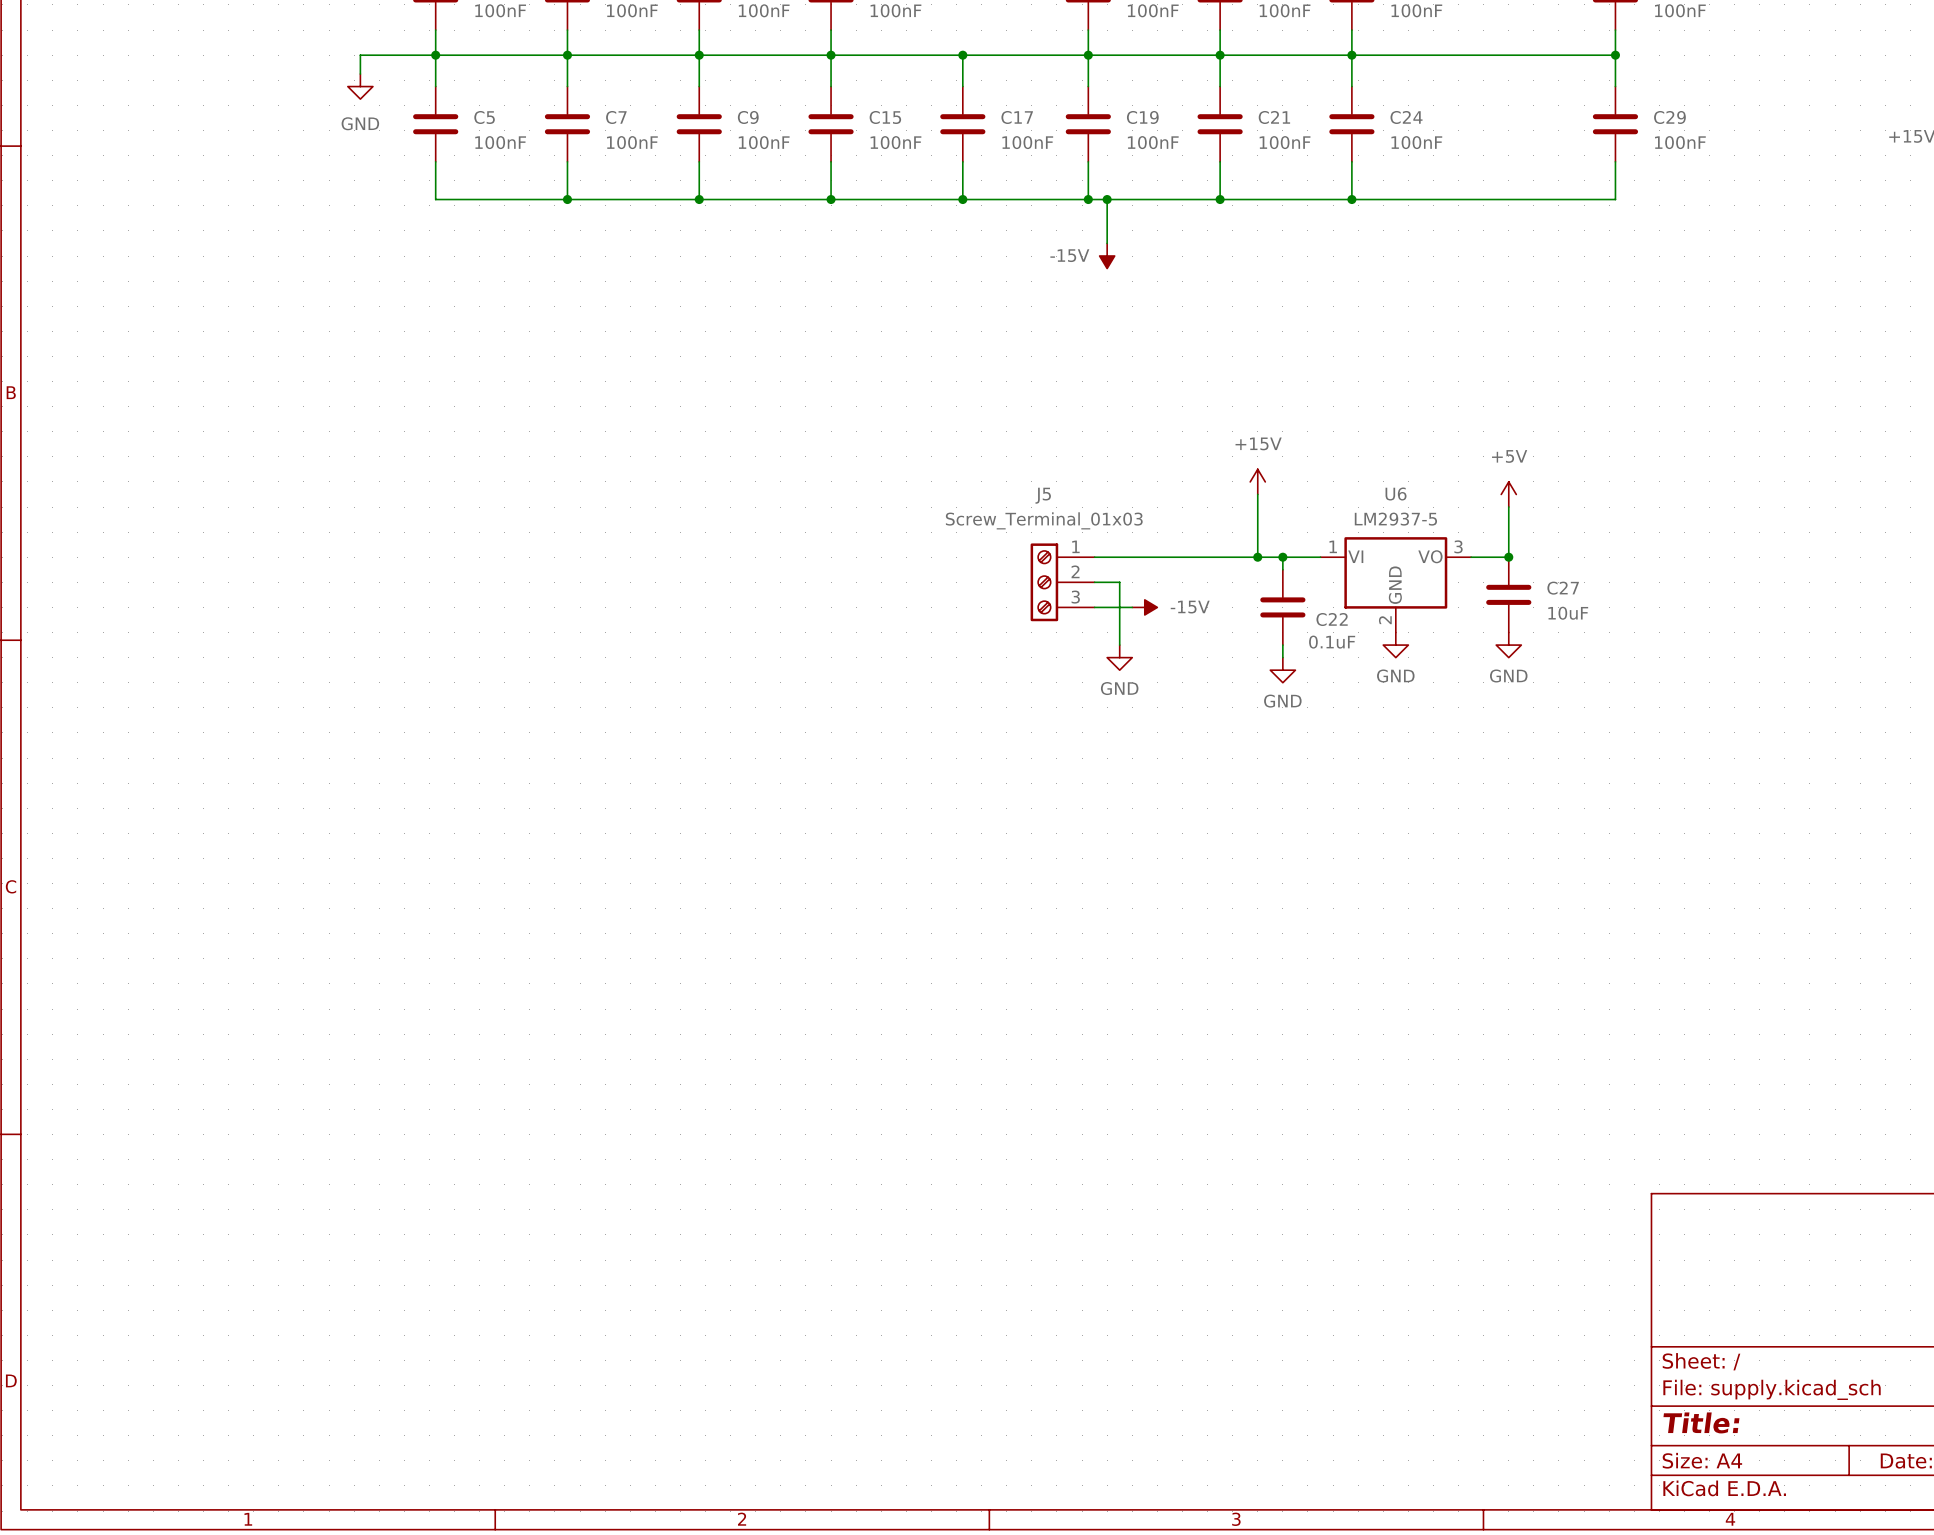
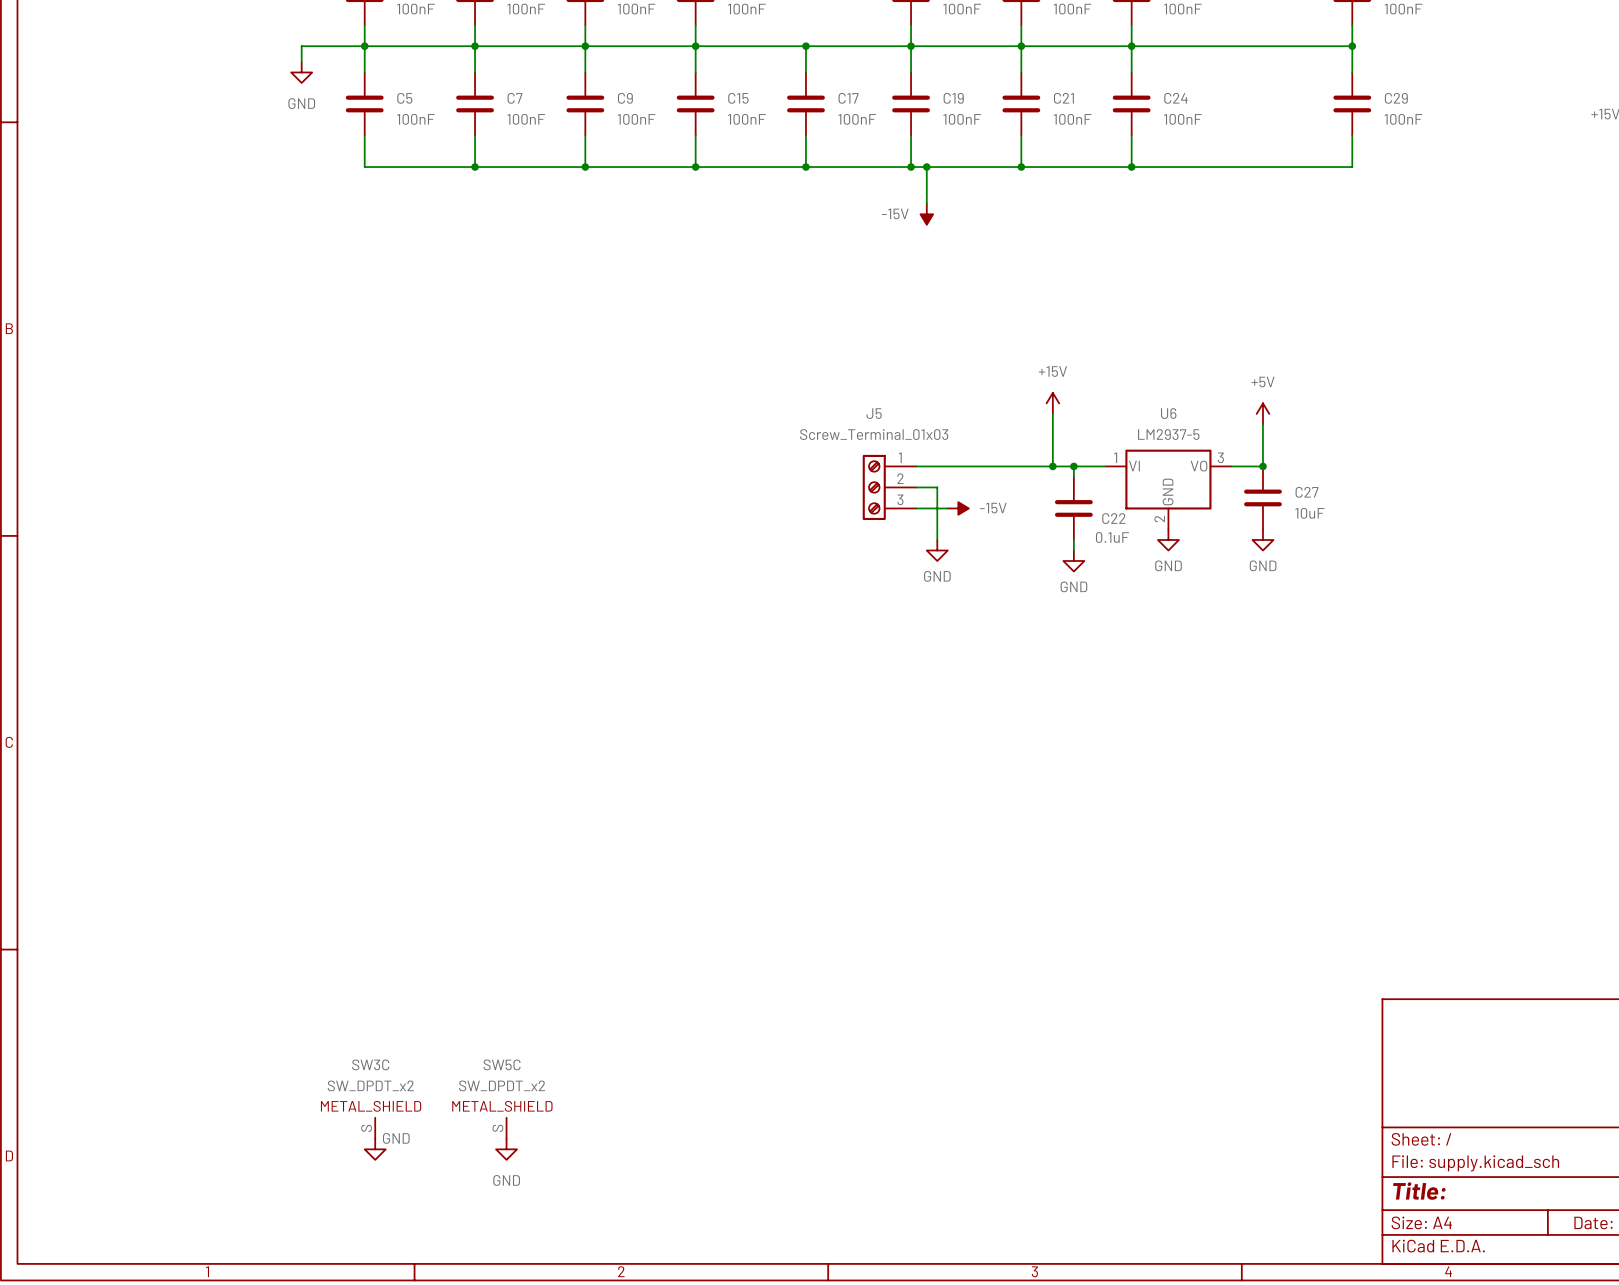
SW3C: none -> SW_DPDT_x2 (375, 1128)
SW5C: none -> SW_DPDT_x2 (506, 1128)
power symbol: none -> GND (375, 1149)
power symbol: none -> GND (506, 1149)

